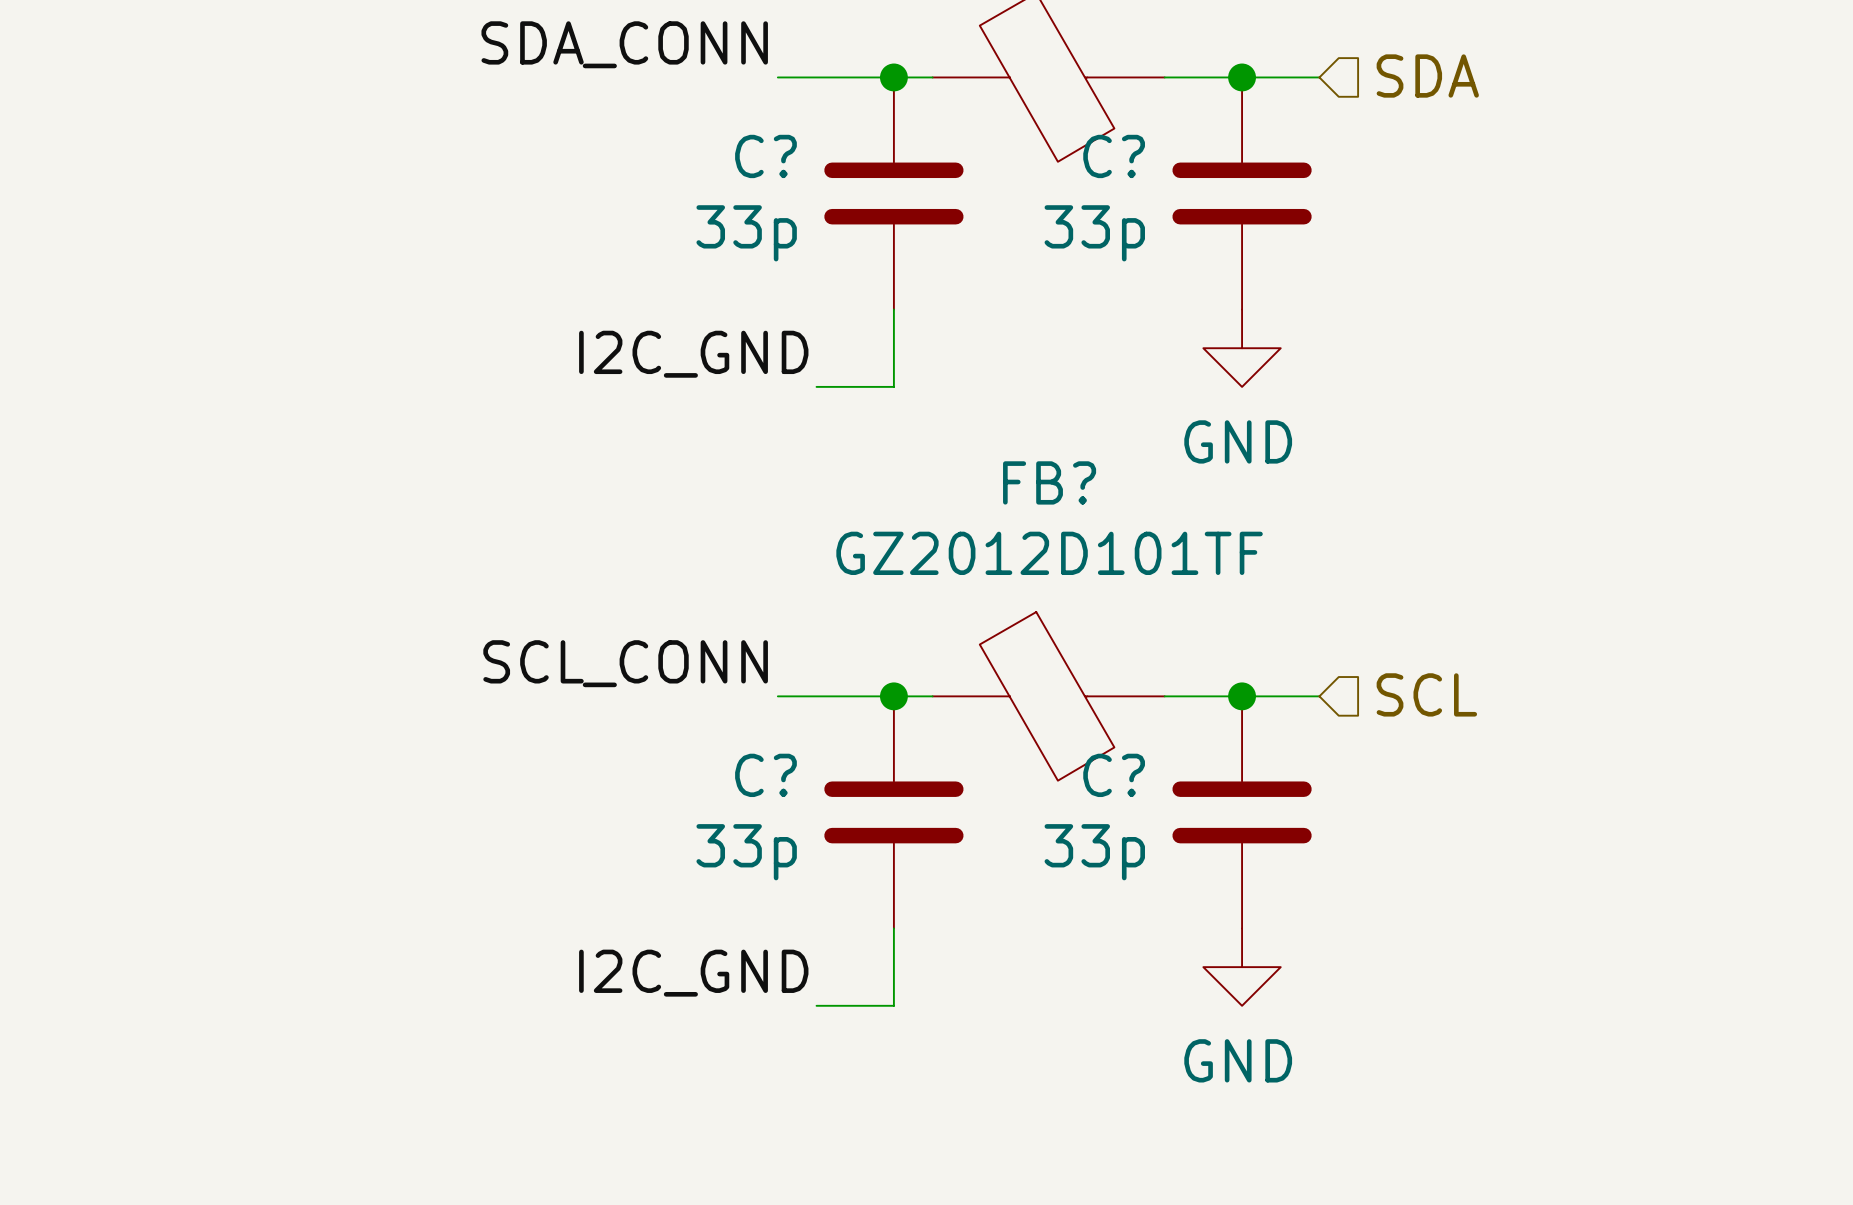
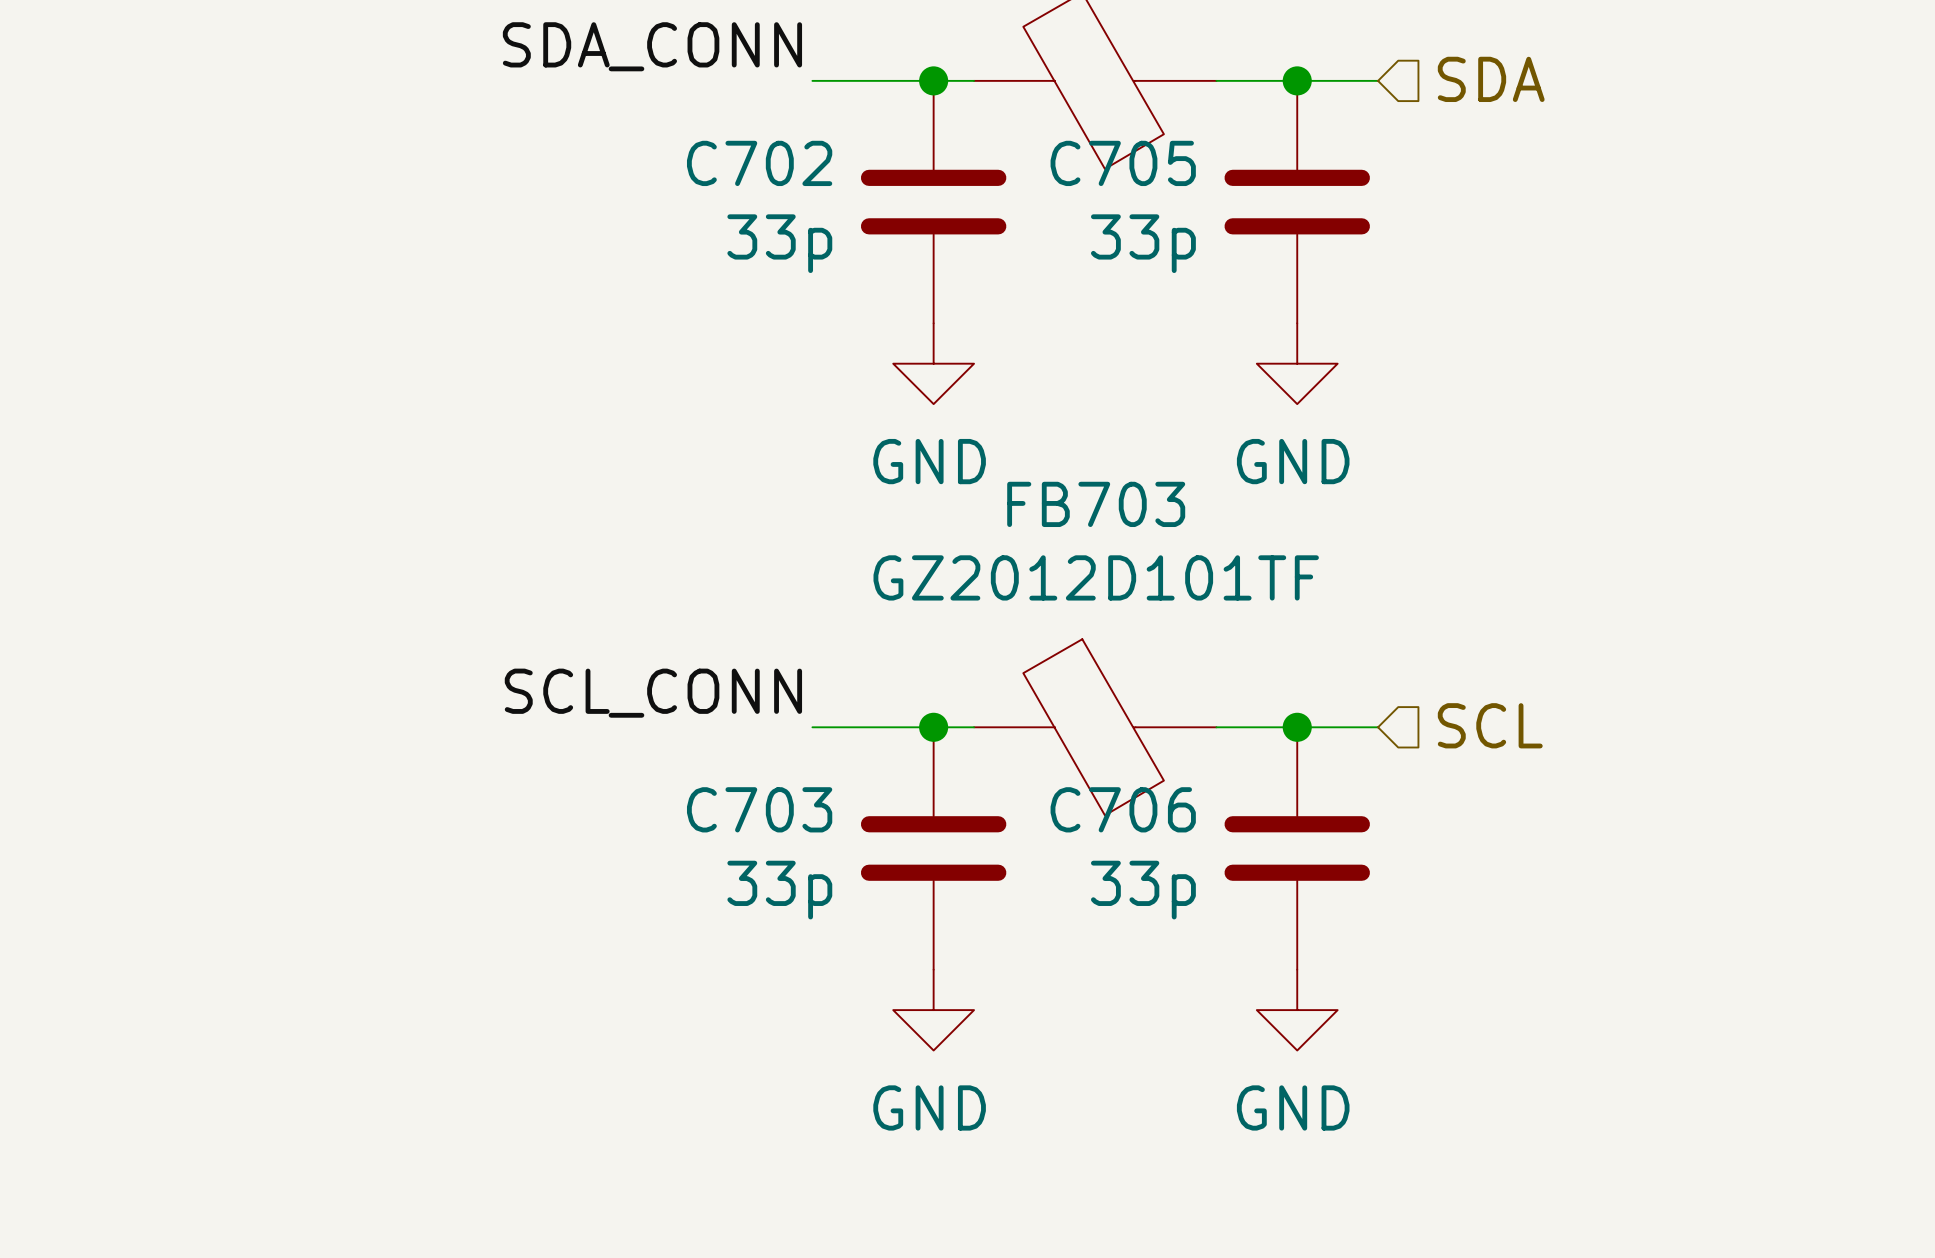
C? name: C? (765, 156) -> C702 (759, 163)
C? name: C? (1114, 156) -> C705 (1123, 163)
wire: (893, 309) (893, 386) (816, 386) -> none
power symbol: none -> GND (933, 363)
label: I2C_GND (693, 354) -> none
FB? name: FB? (1049, 482) -> FB703 (1096, 504)
C? name: C? (765, 775) -> C703 (759, 809)
C? name: C? (1114, 775) -> C706 (1123, 809)
wire: (893, 928) (893, 1005) (816, 1005) -> none
power symbol: none -> GND (933, 1010)
label: I2C_GND (693, 973) -> none

